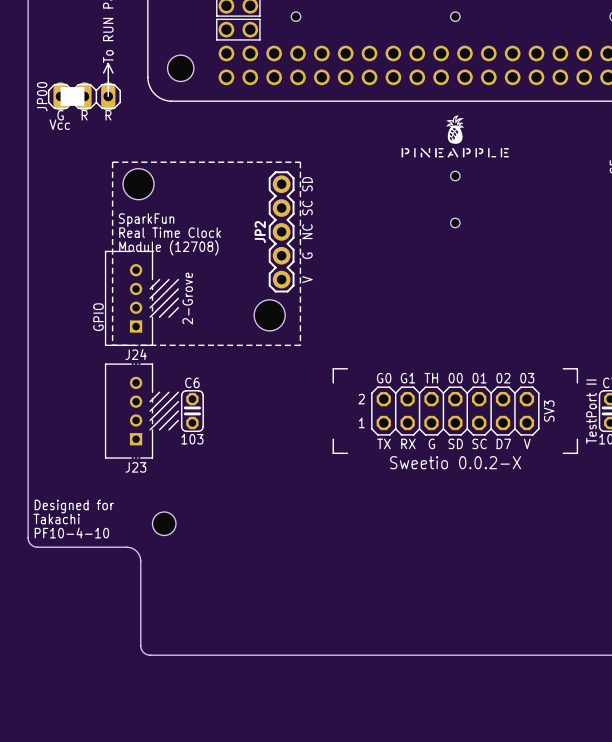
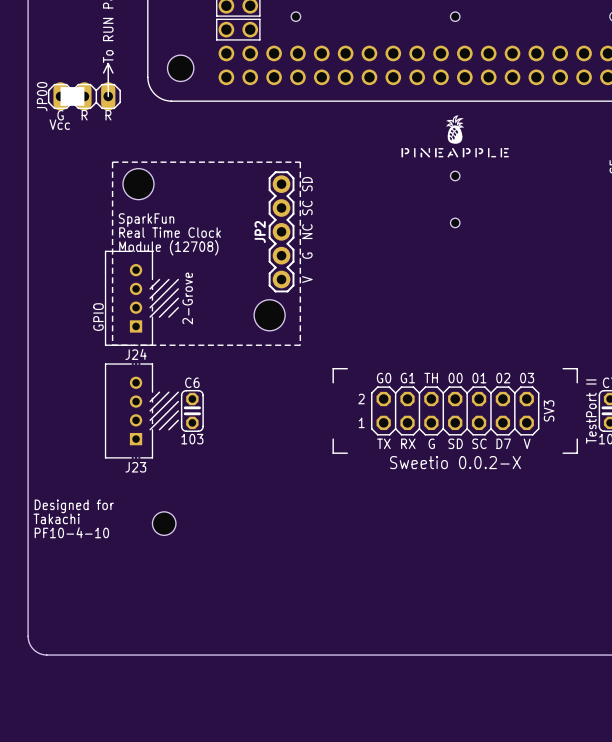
board edge: (28, 537) (30, 543) (36, 547) (126, 547) (136, 551) (140, 561) (140, 647) (144, 653) (150, 655) -> (28, 537) (28, 636) (33, 649) (46, 655) (150, 655)

